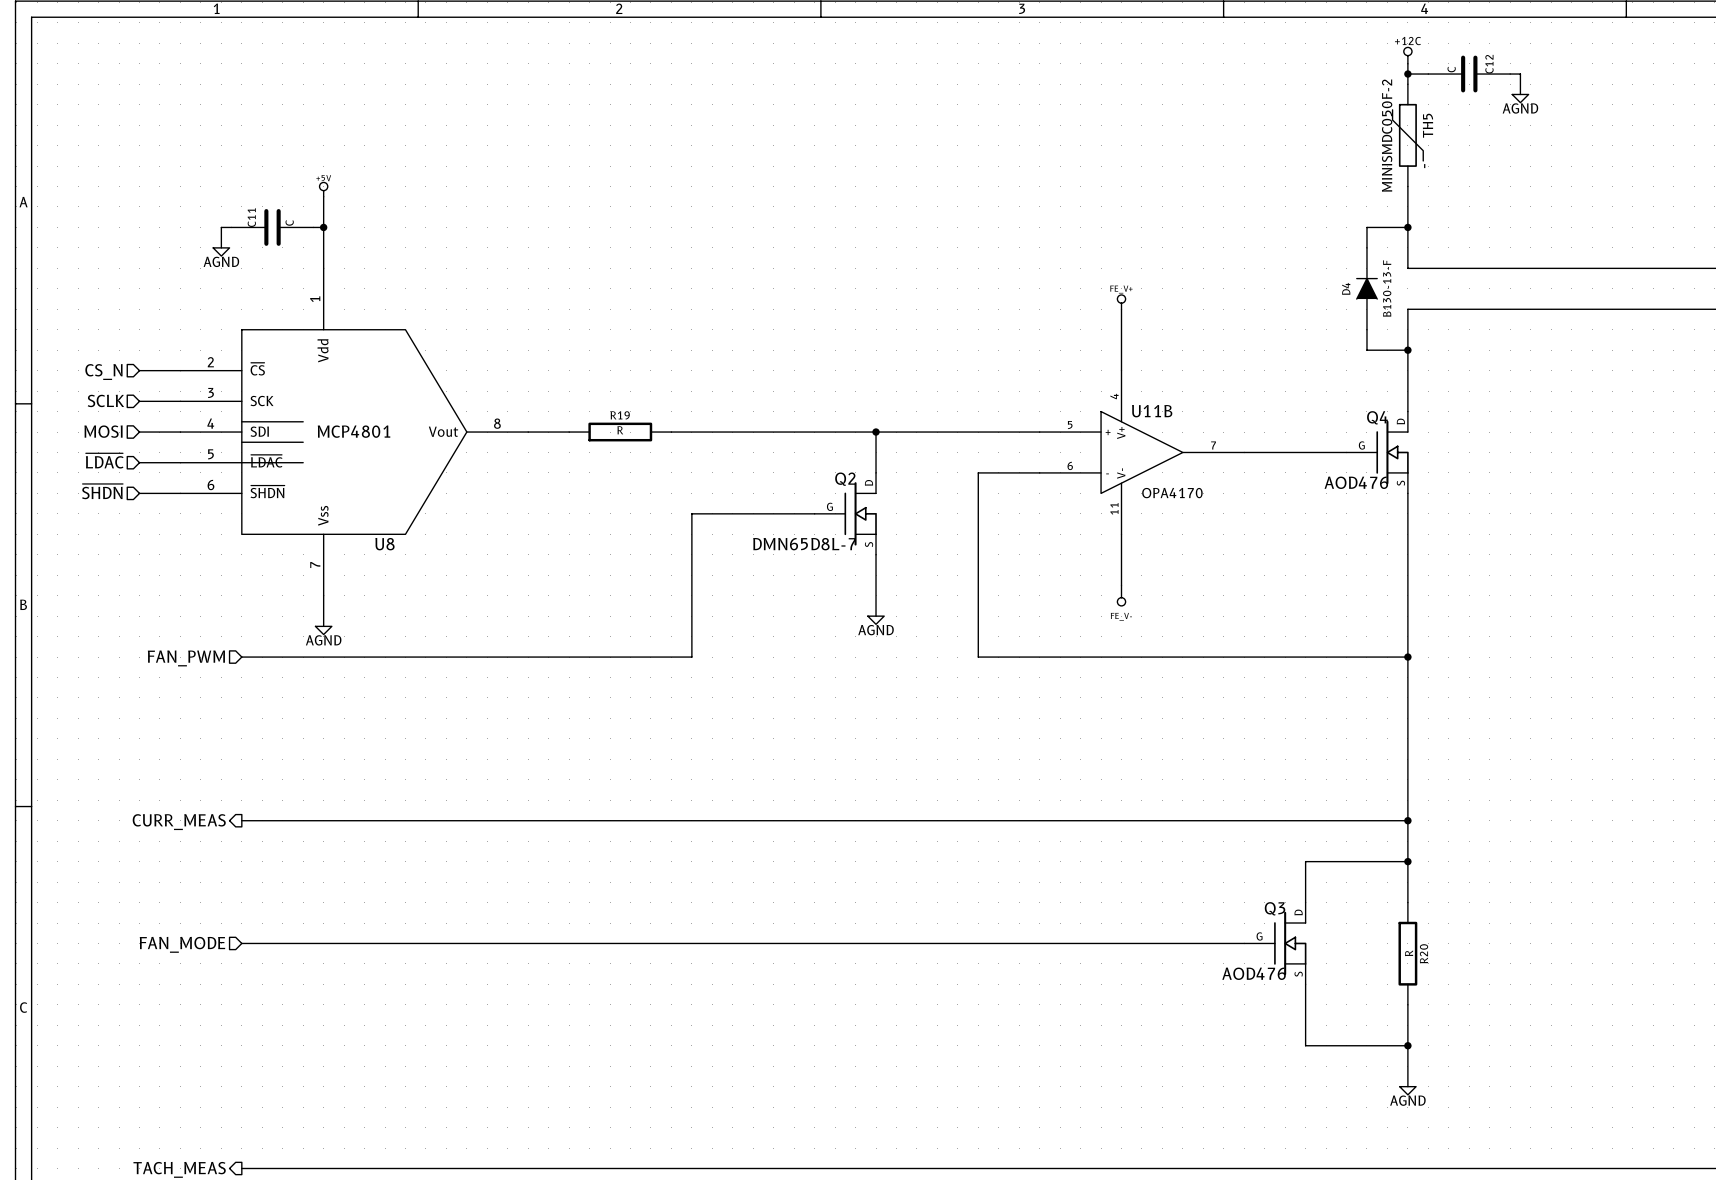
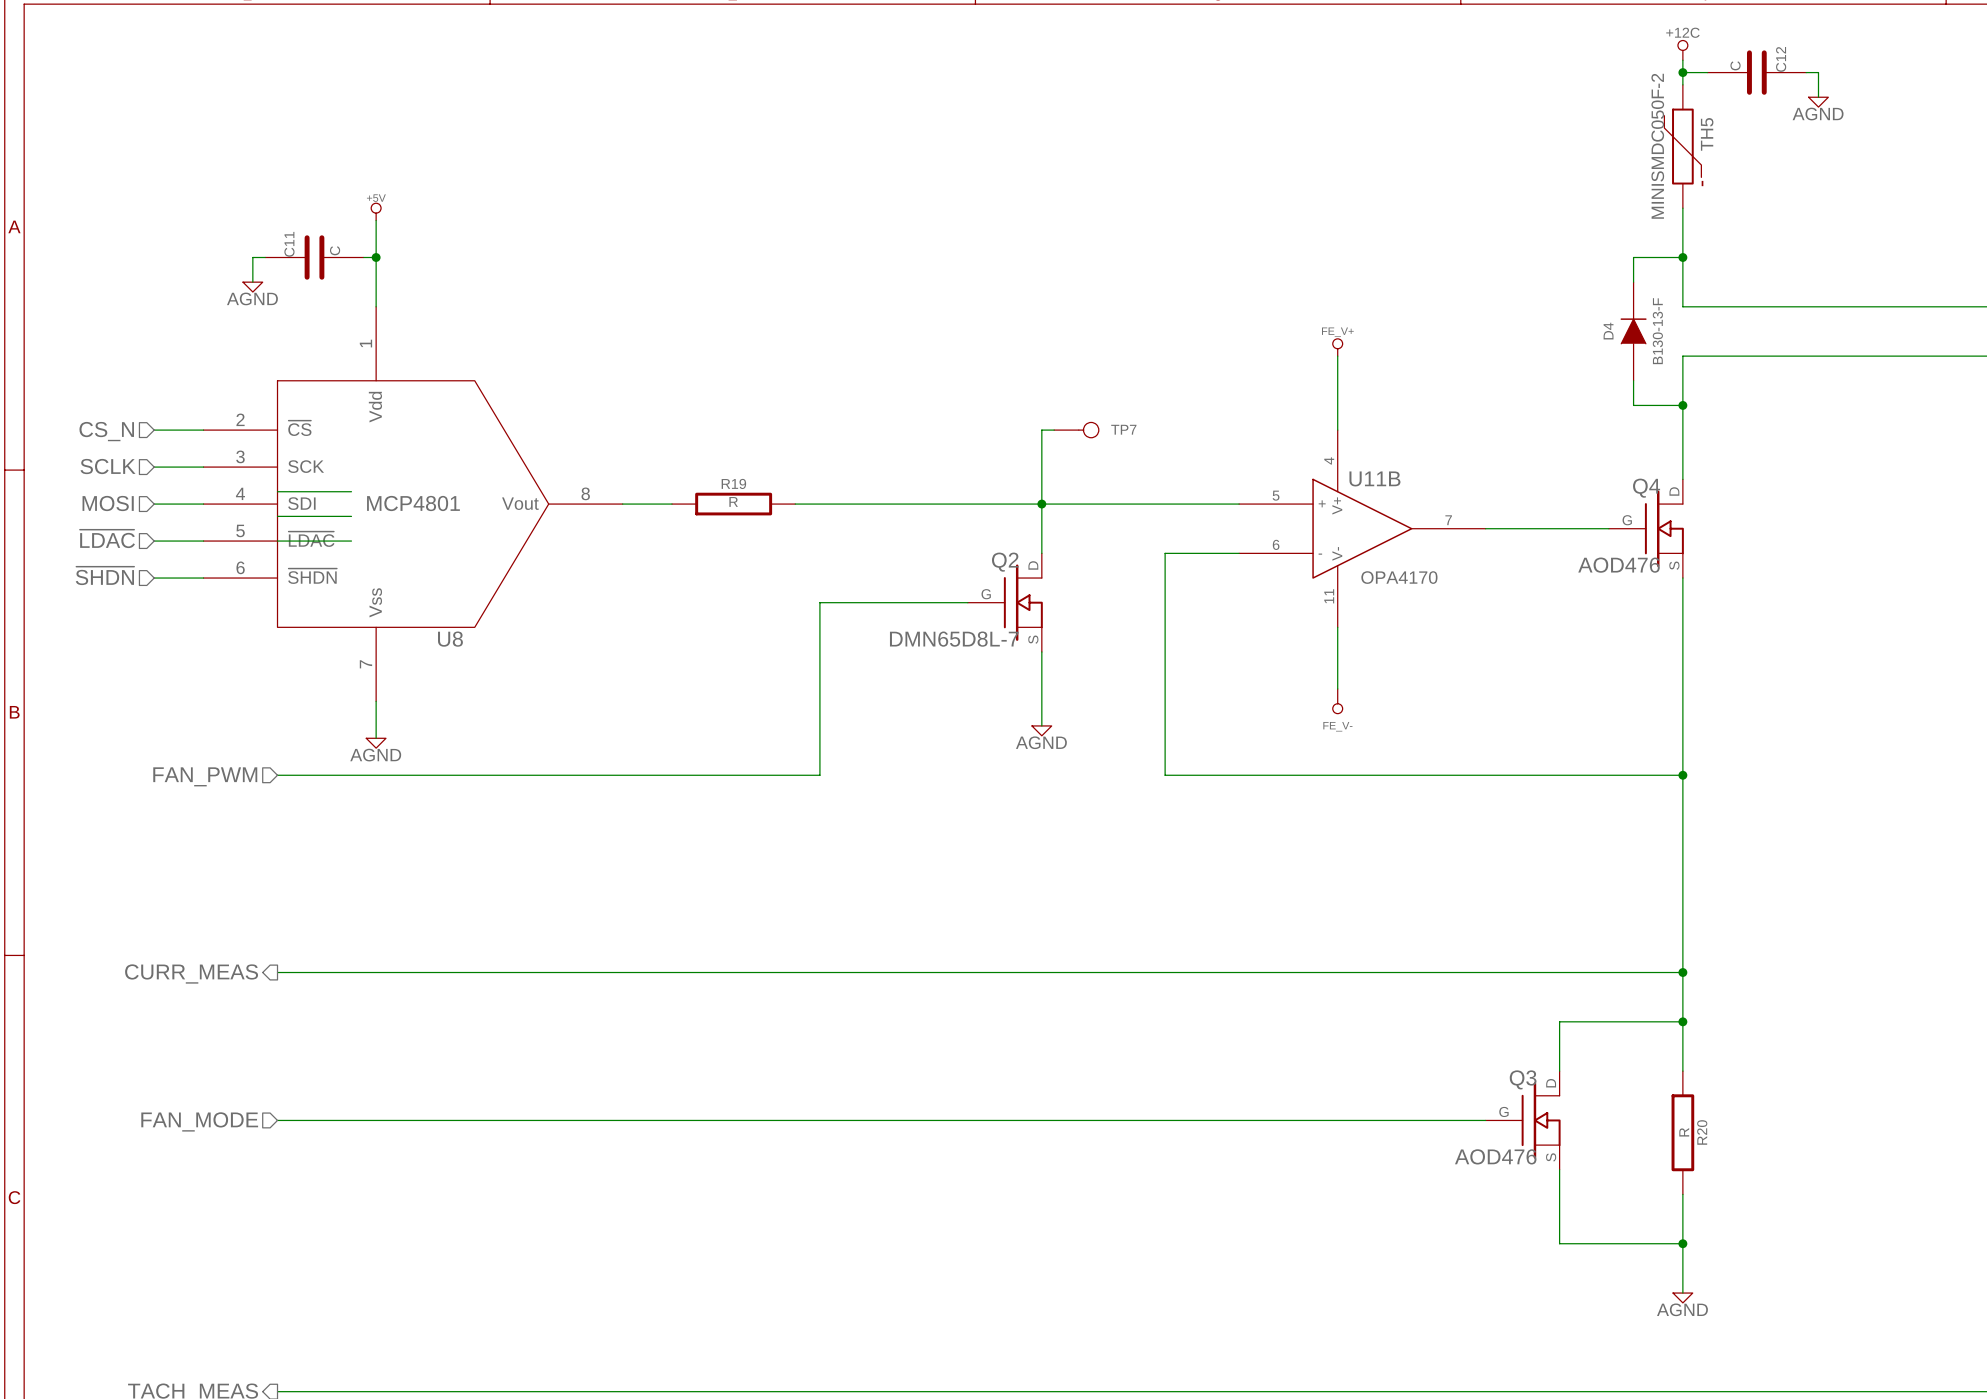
wire: none -> (1054, 430) (1041, 430) (1041, 504)
TP7: none -> (1076, 430)

